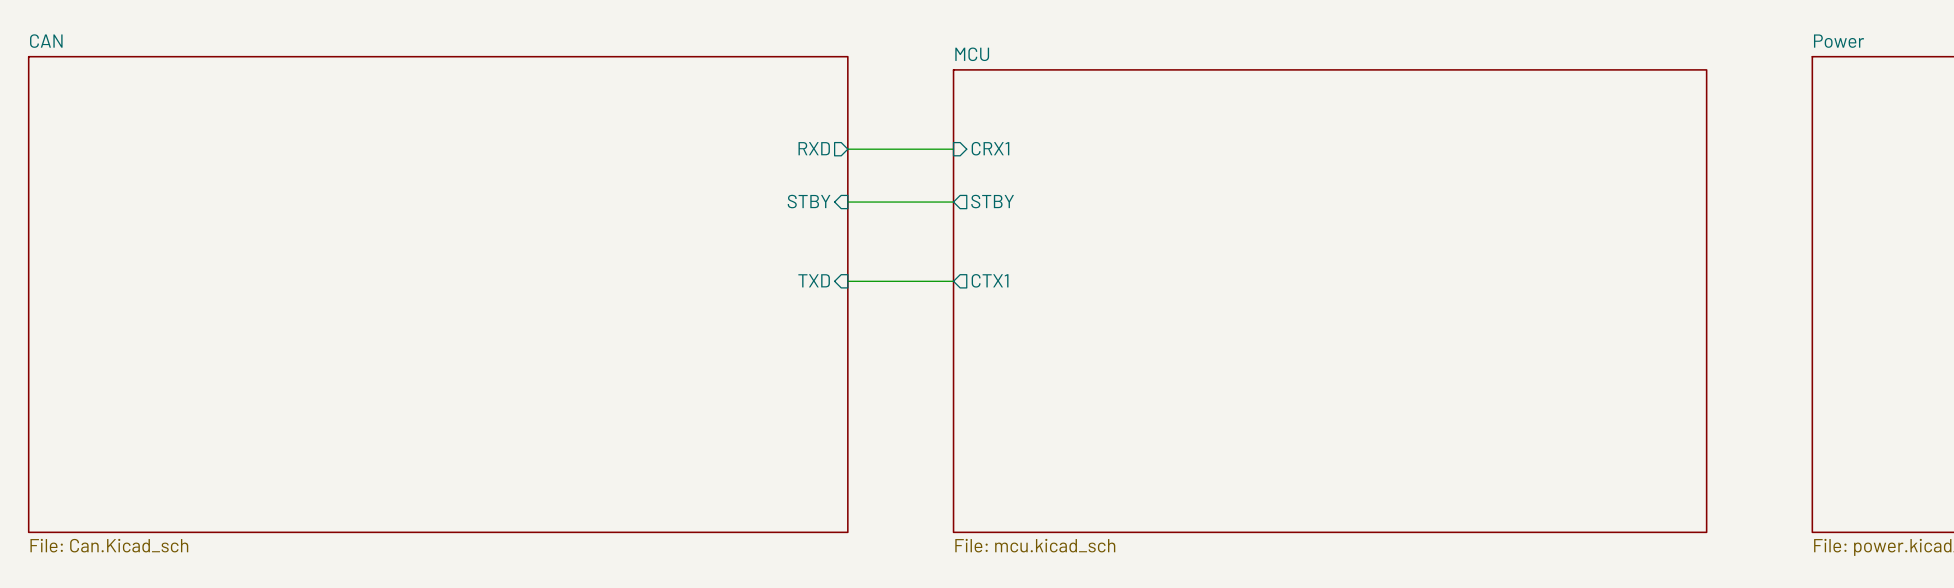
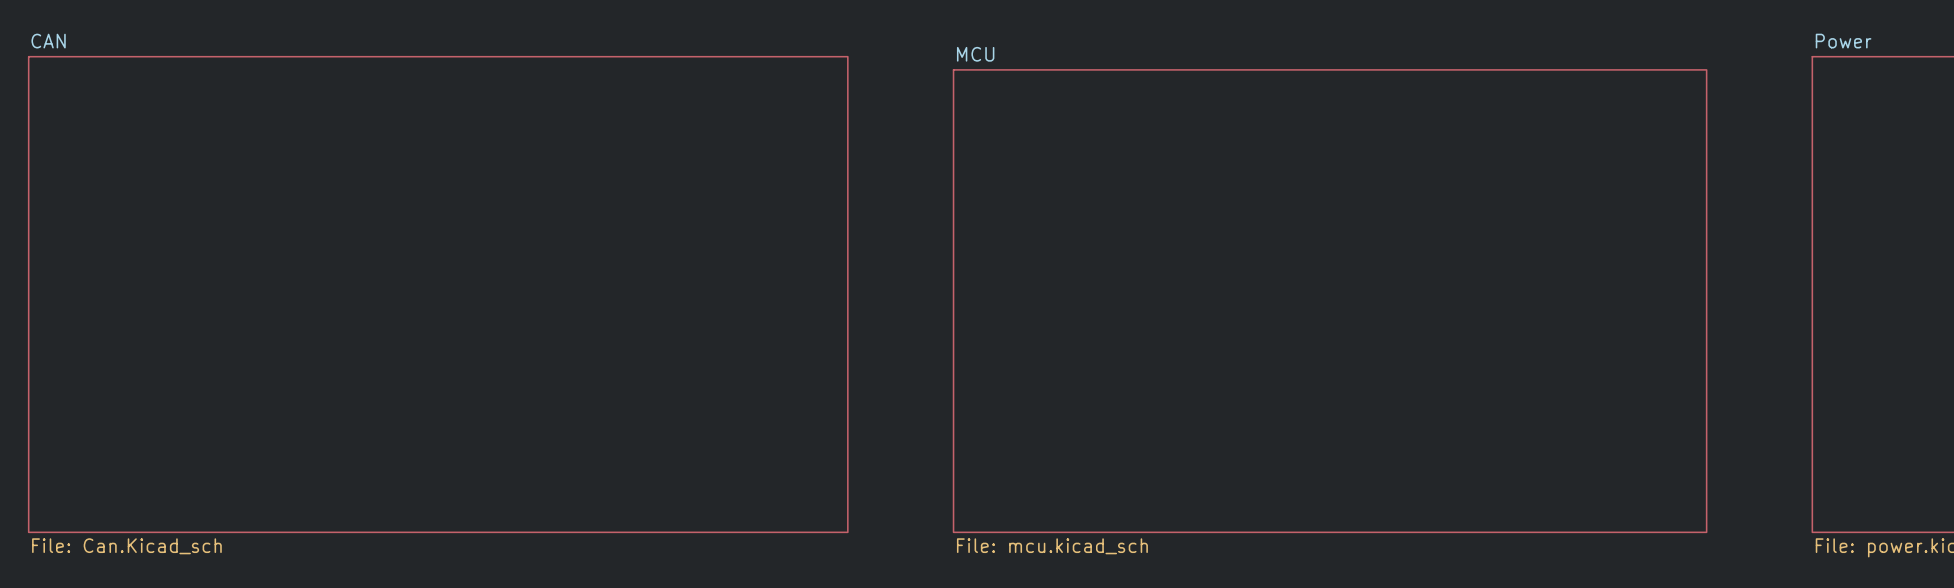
sheet pin: RXD (814, 148) -> none
sheet pin: CRX1 (990, 148) -> none
wire: (847, 149) (953, 149) -> none
sheet pin: STBY (809, 201) -> none
sheet pin: STBY (992, 201) -> none
wire: (847, 202) (953, 202) -> none
sheet pin: TXD (814, 280) -> none
sheet pin: CTX1 (990, 280) -> none
wire: (847, 281) (953, 281) -> none

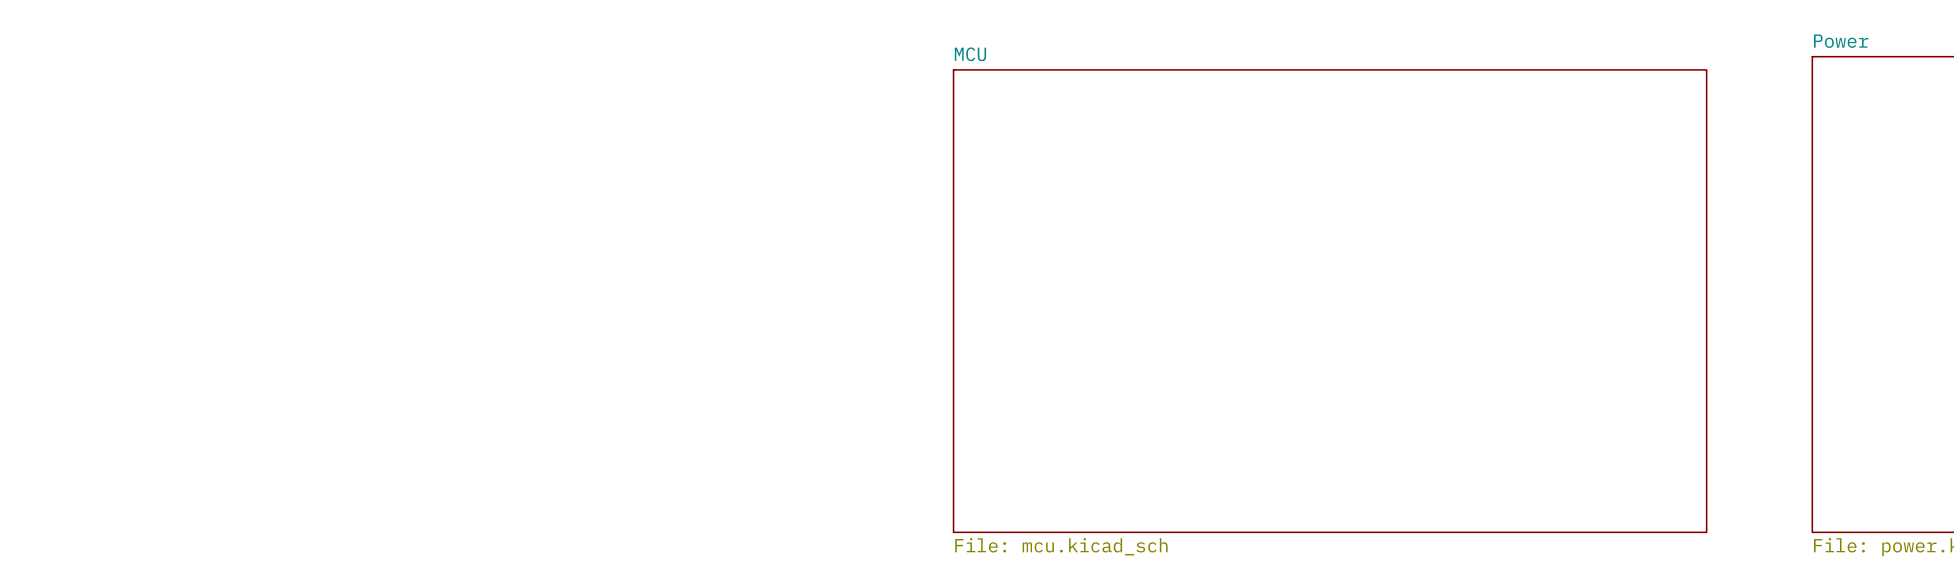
sheet CAN: File: Can.Kicad_sch (438, 294) -> none

